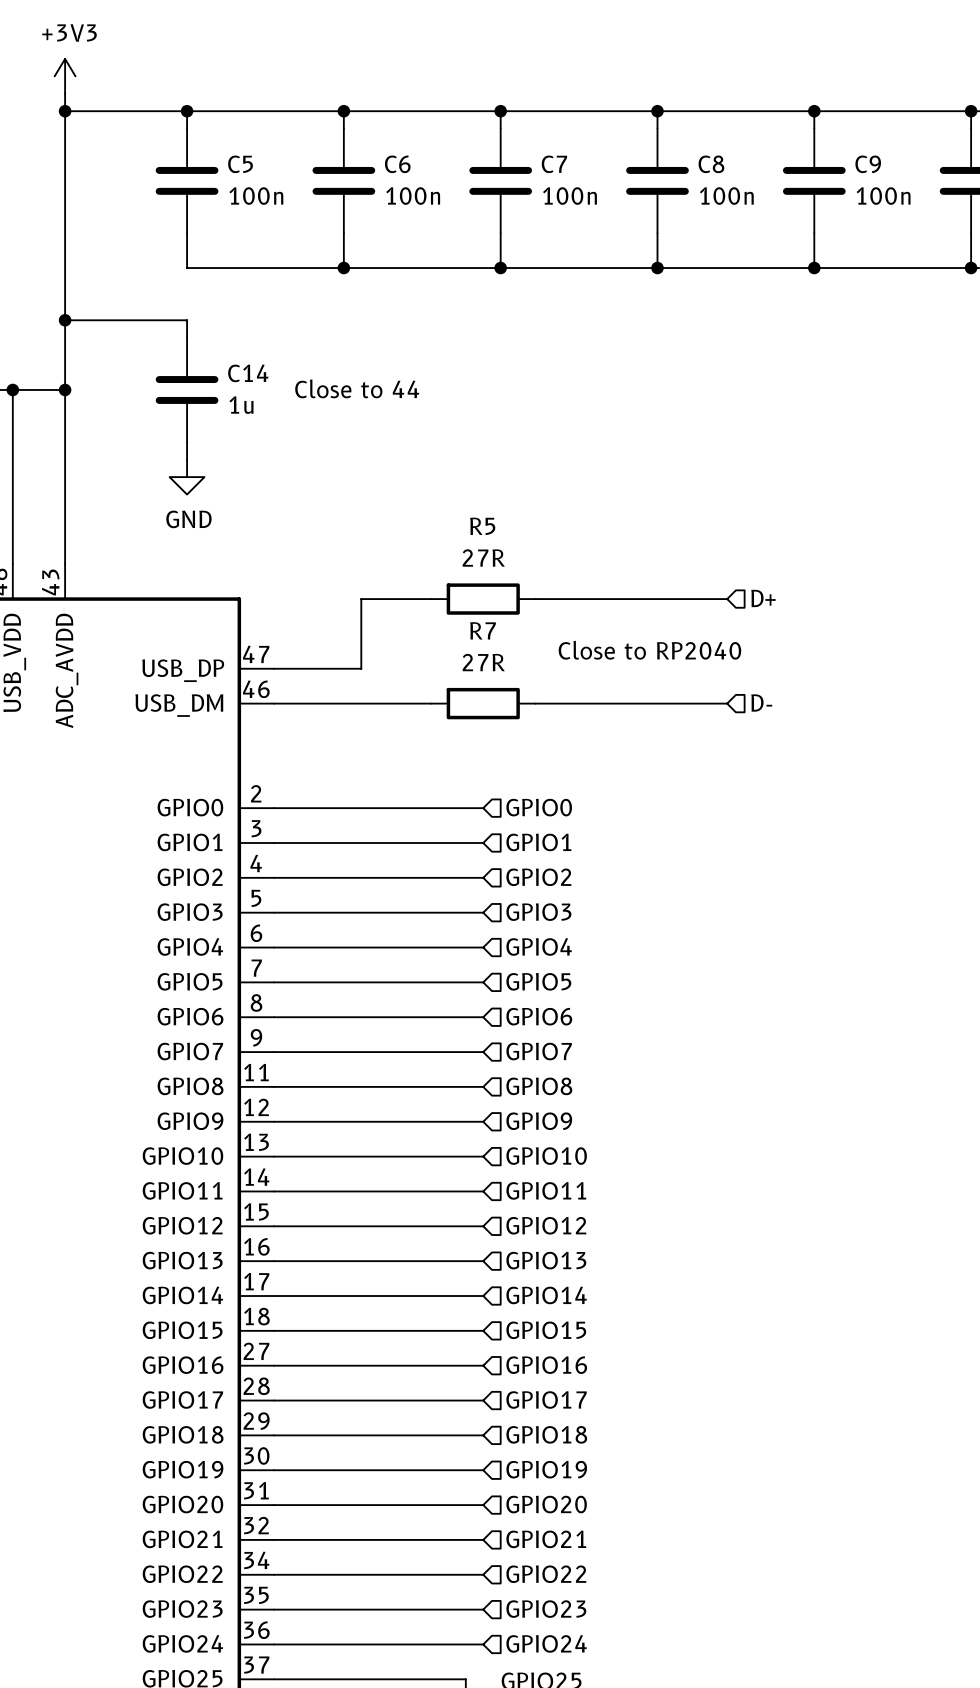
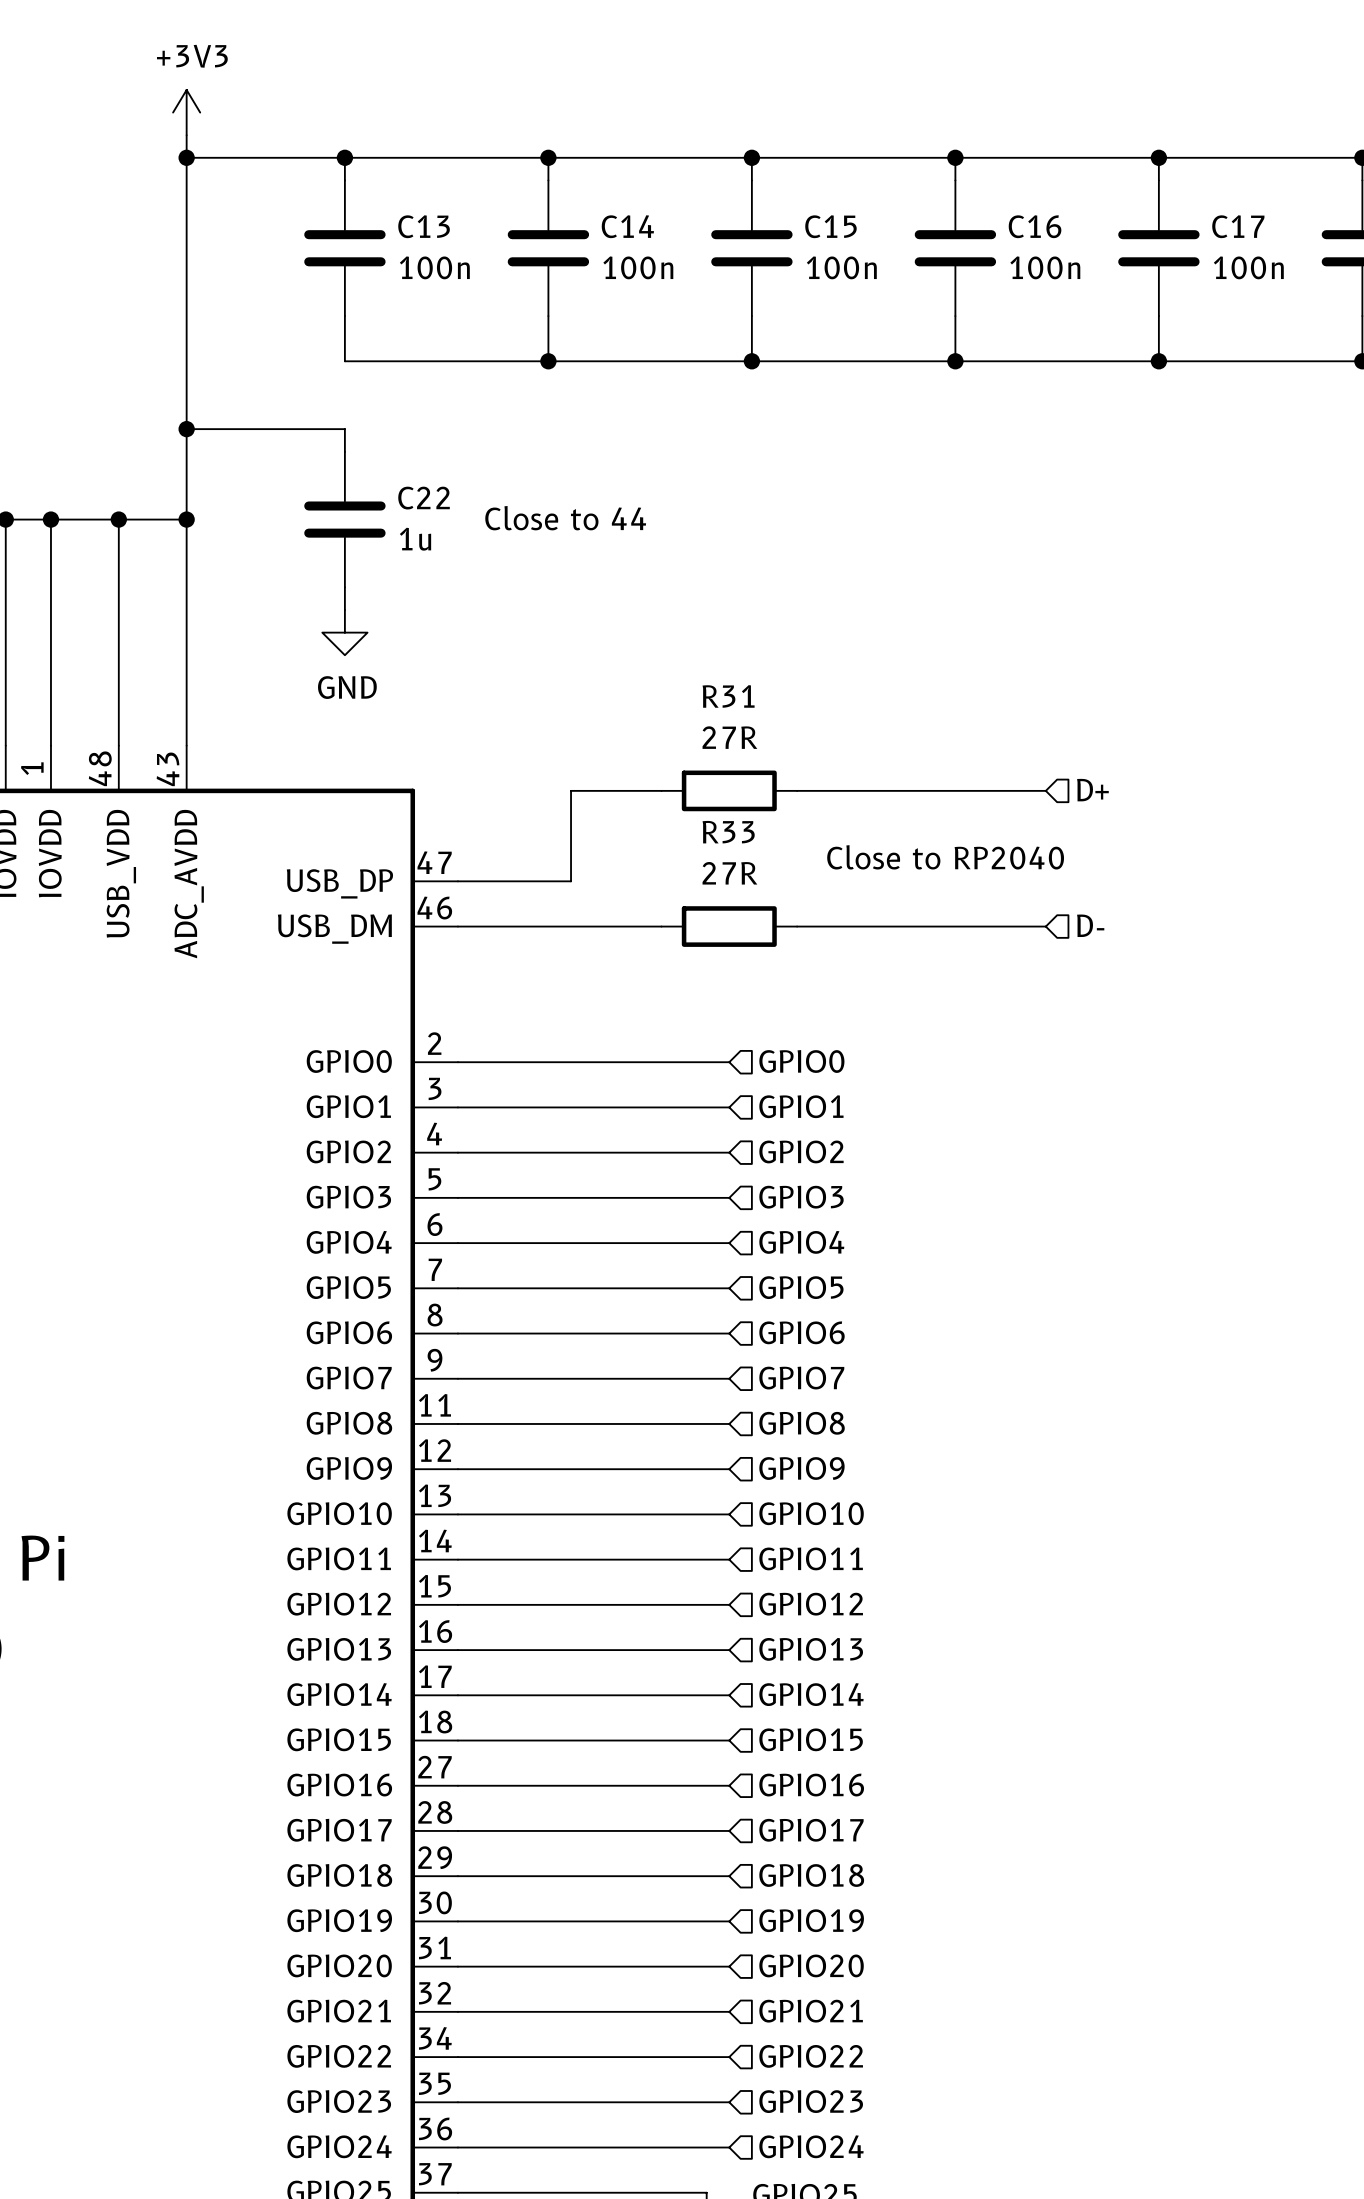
C5 name: C5 (240, 164) -> C13 (424, 226)
C6 name: C6 (397, 164) -> C14 (627, 226)
C7 name: C7 (554, 164) -> C15 (830, 226)
C8 name: C8 (711, 164) -> C16 (1035, 226)
C9 name: C9 (868, 164) -> C17 (1238, 226)
C14 name: C14 (248, 373) -> C22 (424, 498)
R5 name: R5 (482, 526) -> R31 (728, 696)
R7 name: R7 (483, 630) -> R33 (728, 832)

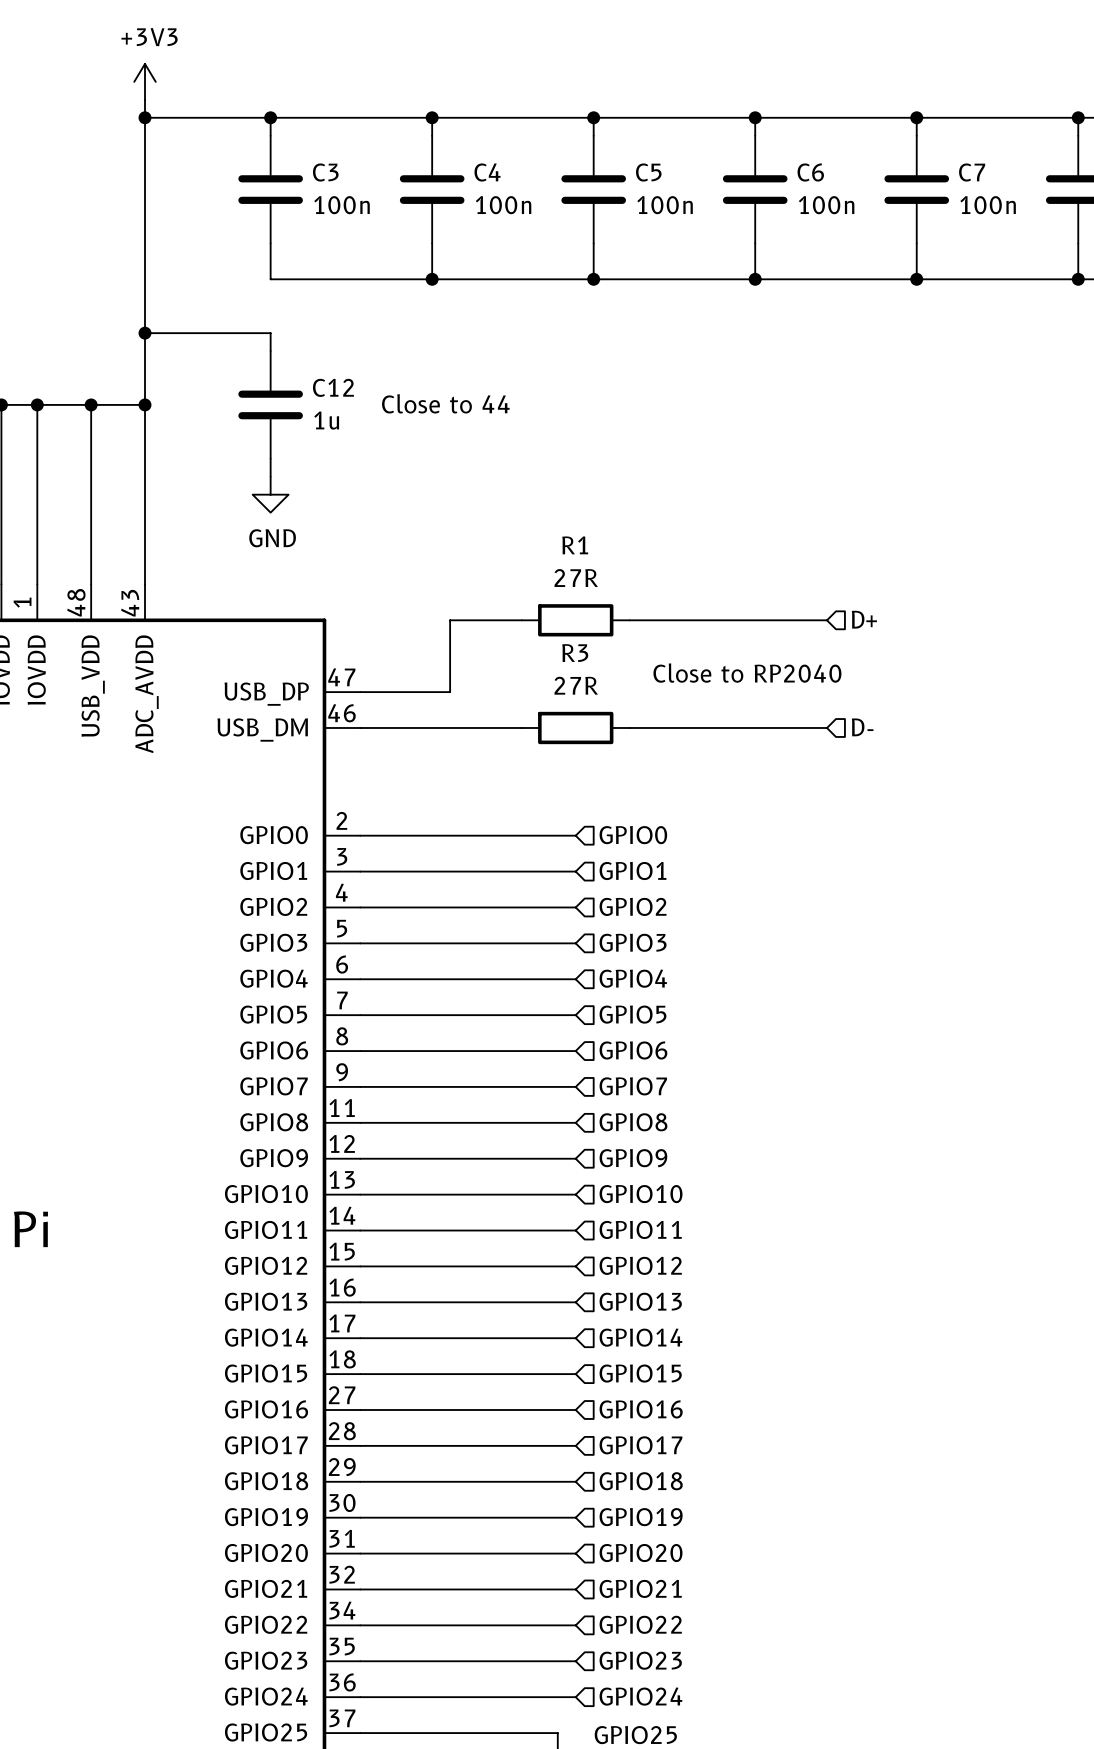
C13 name: C13 (424, 226) -> C3 (325, 172)
C14 name: C14 (627, 226) -> C4 (487, 172)
C15 name: C15 (830, 226) -> C5 (648, 172)
C16 name: C16 (1035, 226) -> C6 (810, 172)
C17 name: C17 (1238, 226) -> C7 (972, 172)
C22 name: C22 (424, 498) -> C12 (333, 387)
R31 name: R31 (728, 696) -> R1 (575, 545)
R33 name: R33 (728, 832) -> R3 (575, 653)

